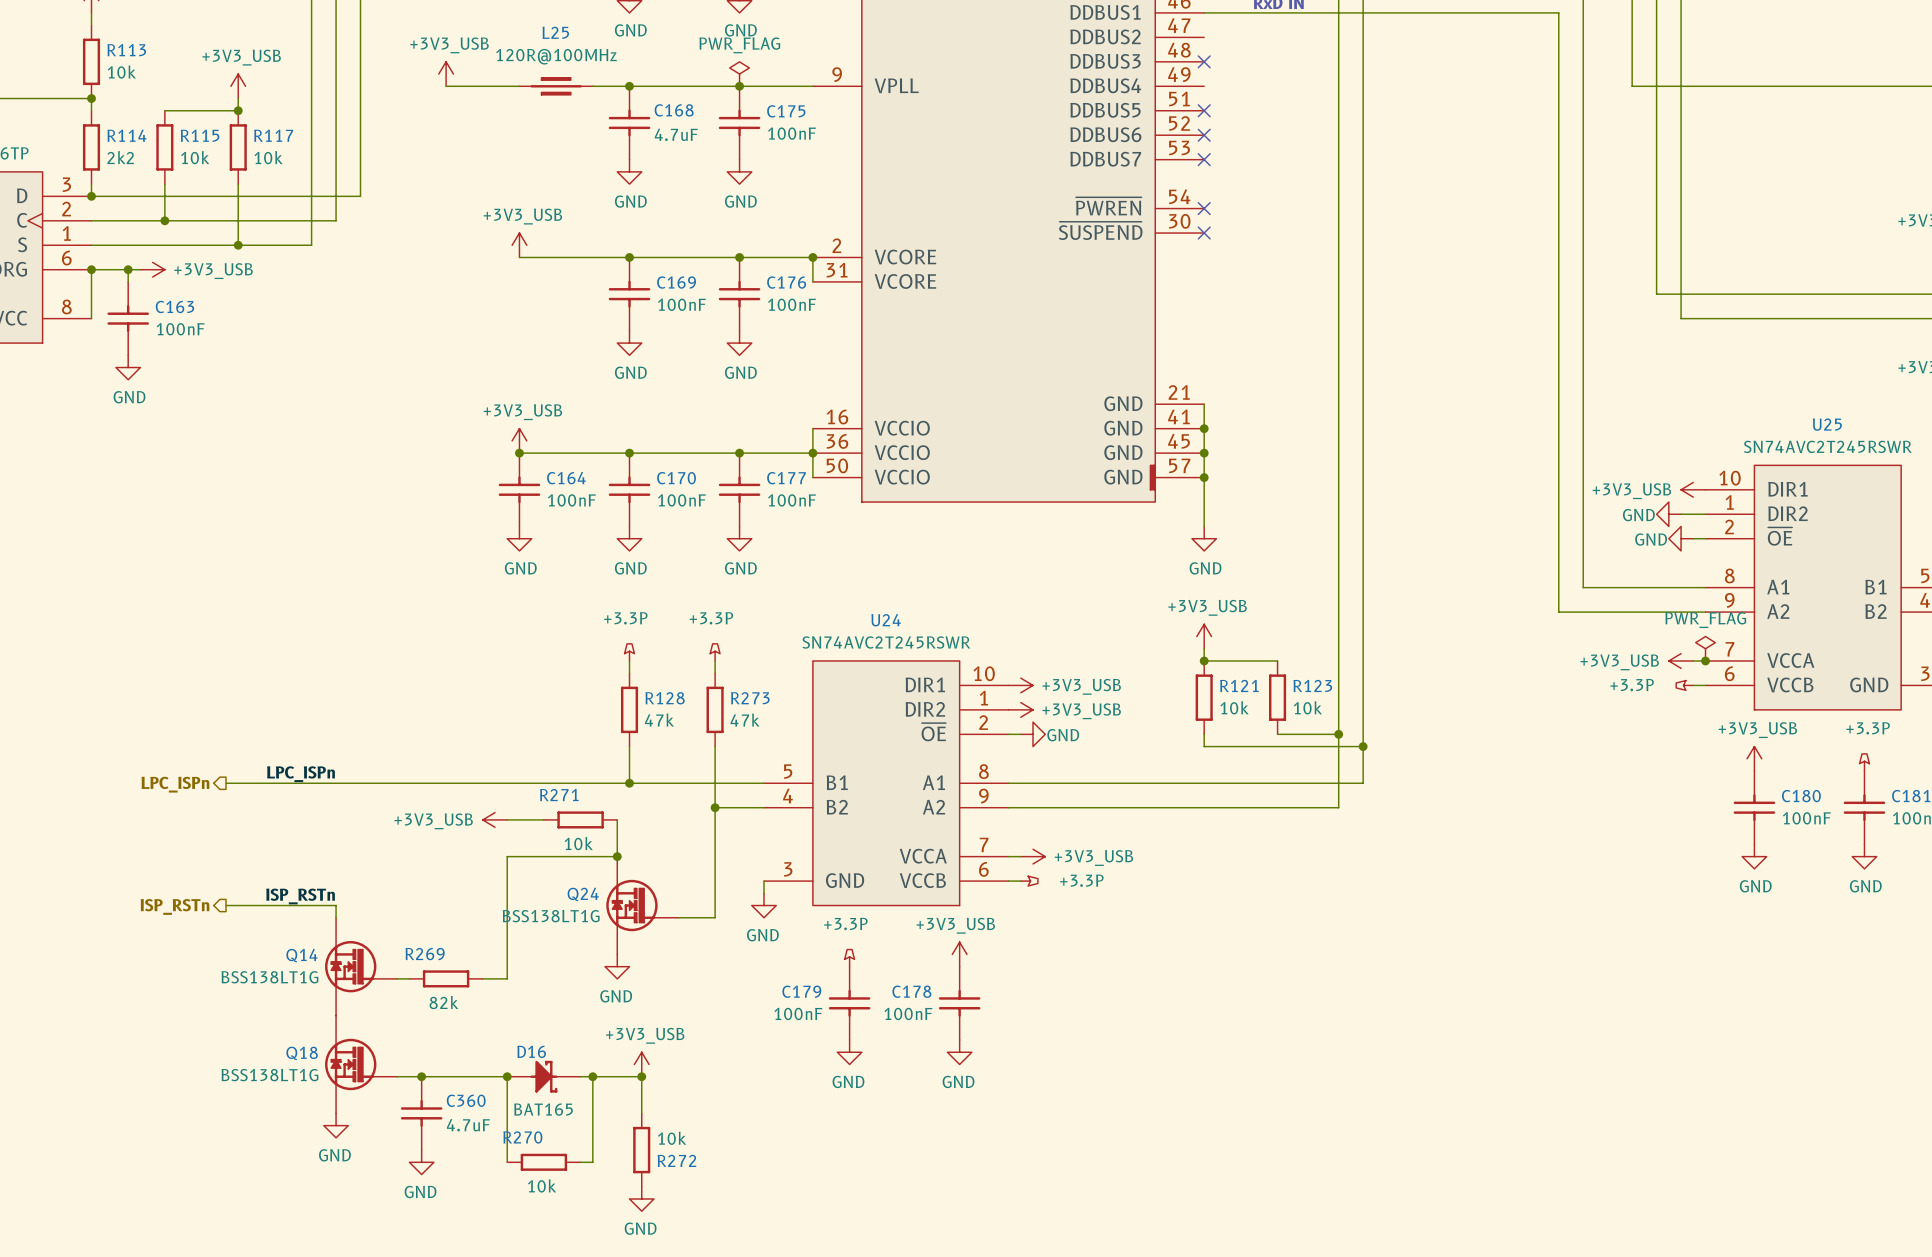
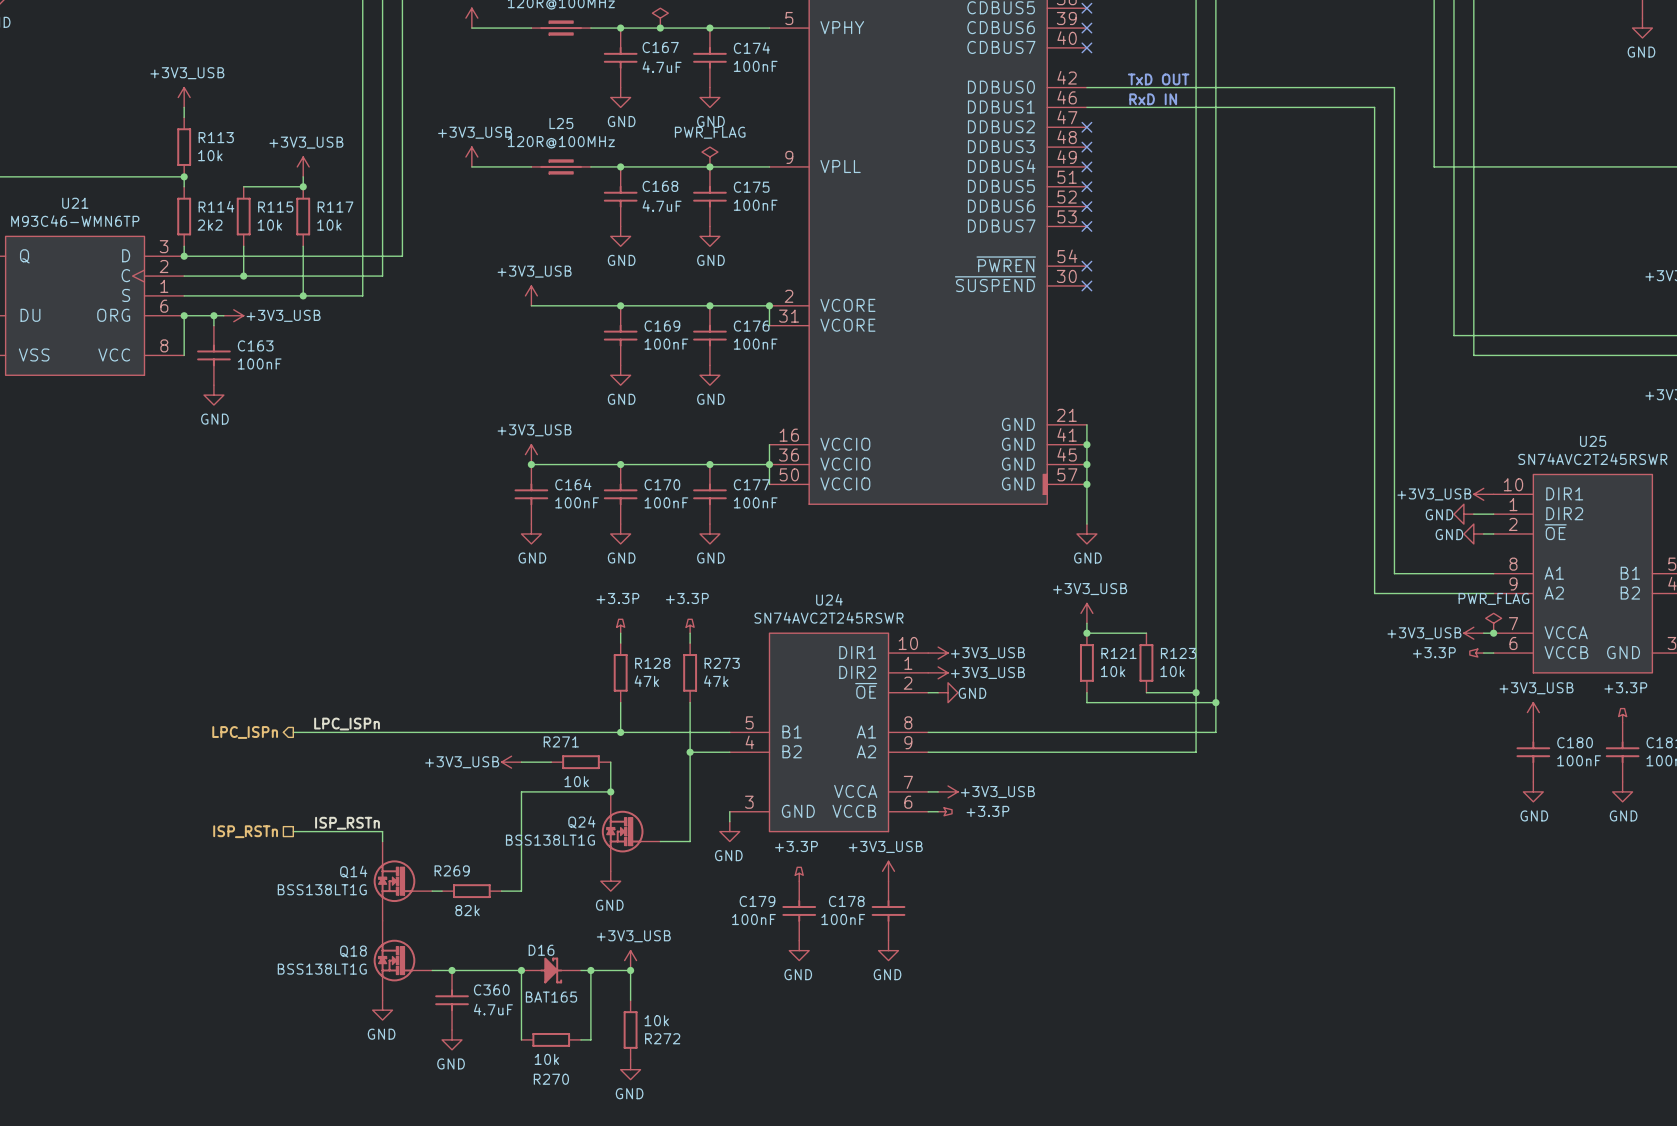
no-connect mark: none -> (1086, 127)
no-connect mark: none -> (1086, 166)
hierarchical label shape: output (174, 906) -> passive (245, 831)
R270 name position: R270 (522, 1137) -> R270 (551, 1079)

